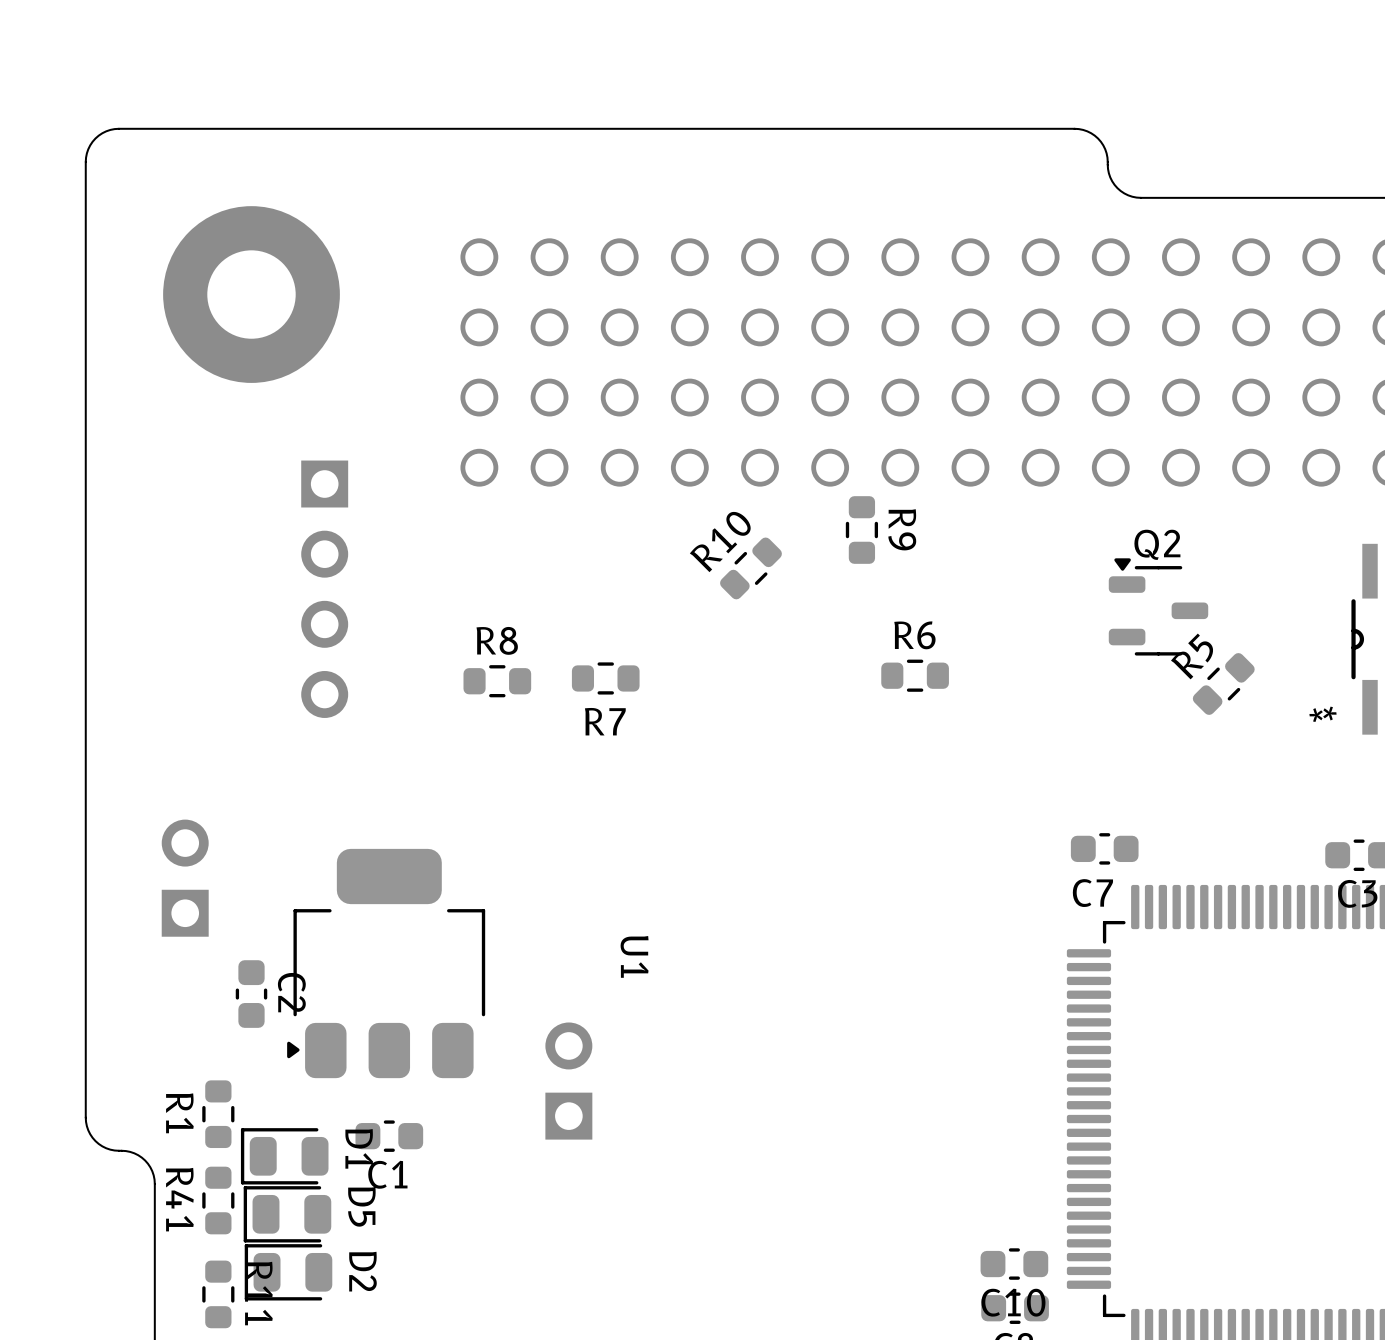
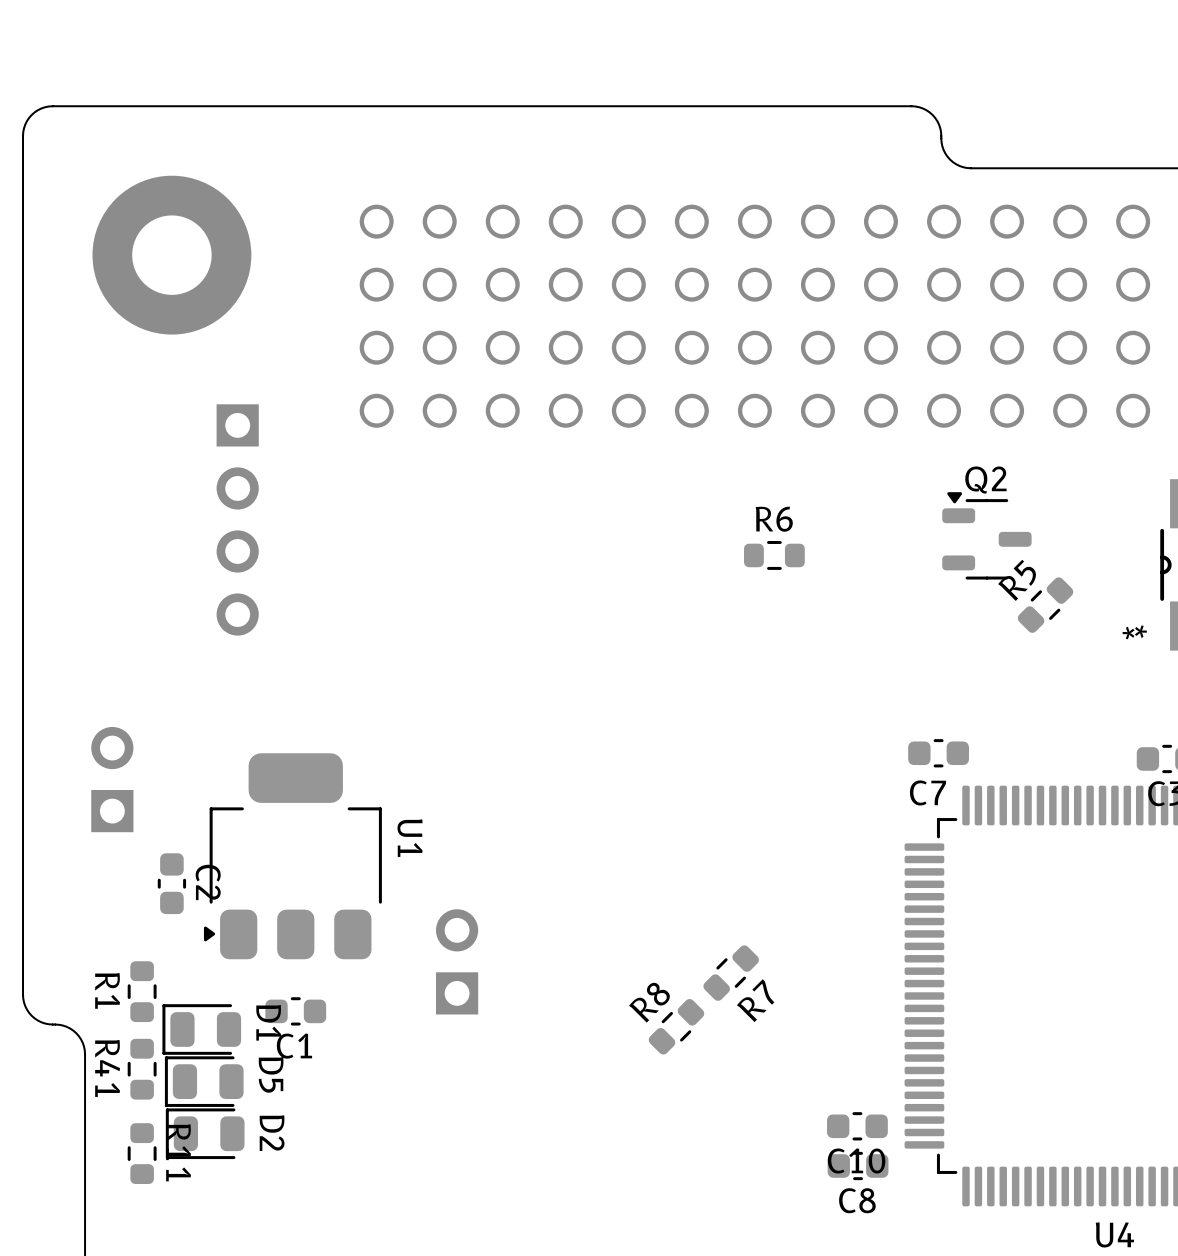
R9: (861, 530) -> none
R10: (750, 568) -> none
R6 position: (915, 675) -> (774, 555)
R7 rotation: 0° (605, 678) -> 45° counterclockwise (731, 973)
R7 position: (605, 678) -> (731, 973)
R8 rotation: 0° (497, 681) -> 45° counterclockwise (676, 1026)
R8 position: (497, 681) -> (676, 1026)
U1 name position: U1 (634, 956) -> U1 (410, 838)

